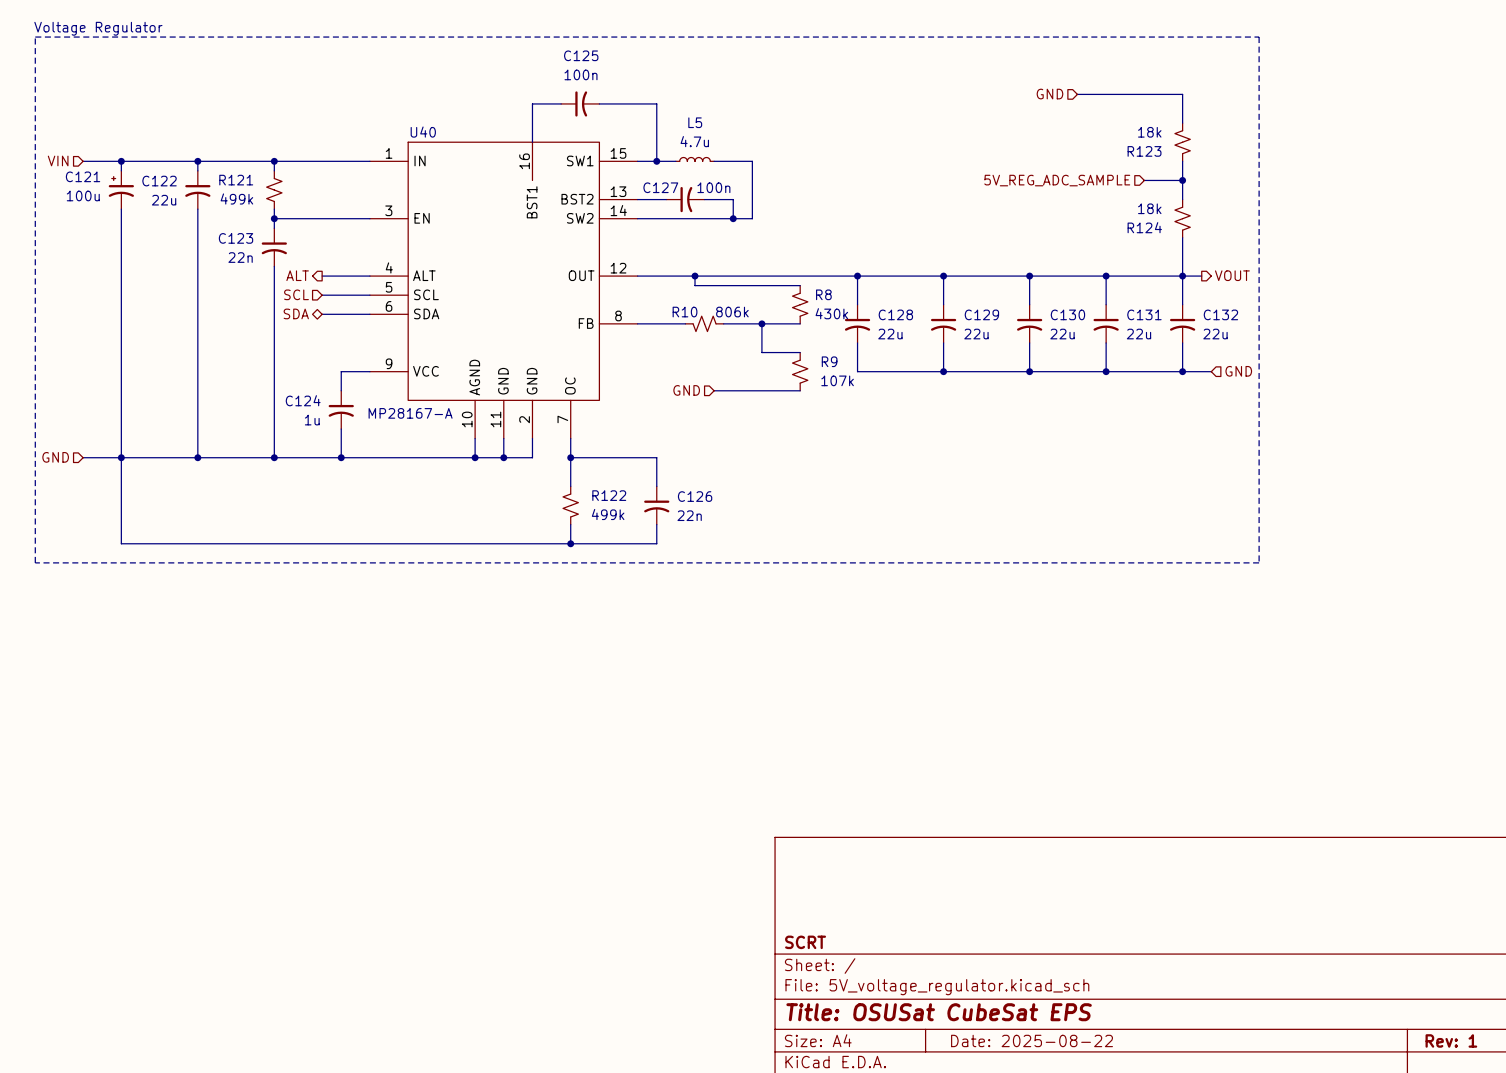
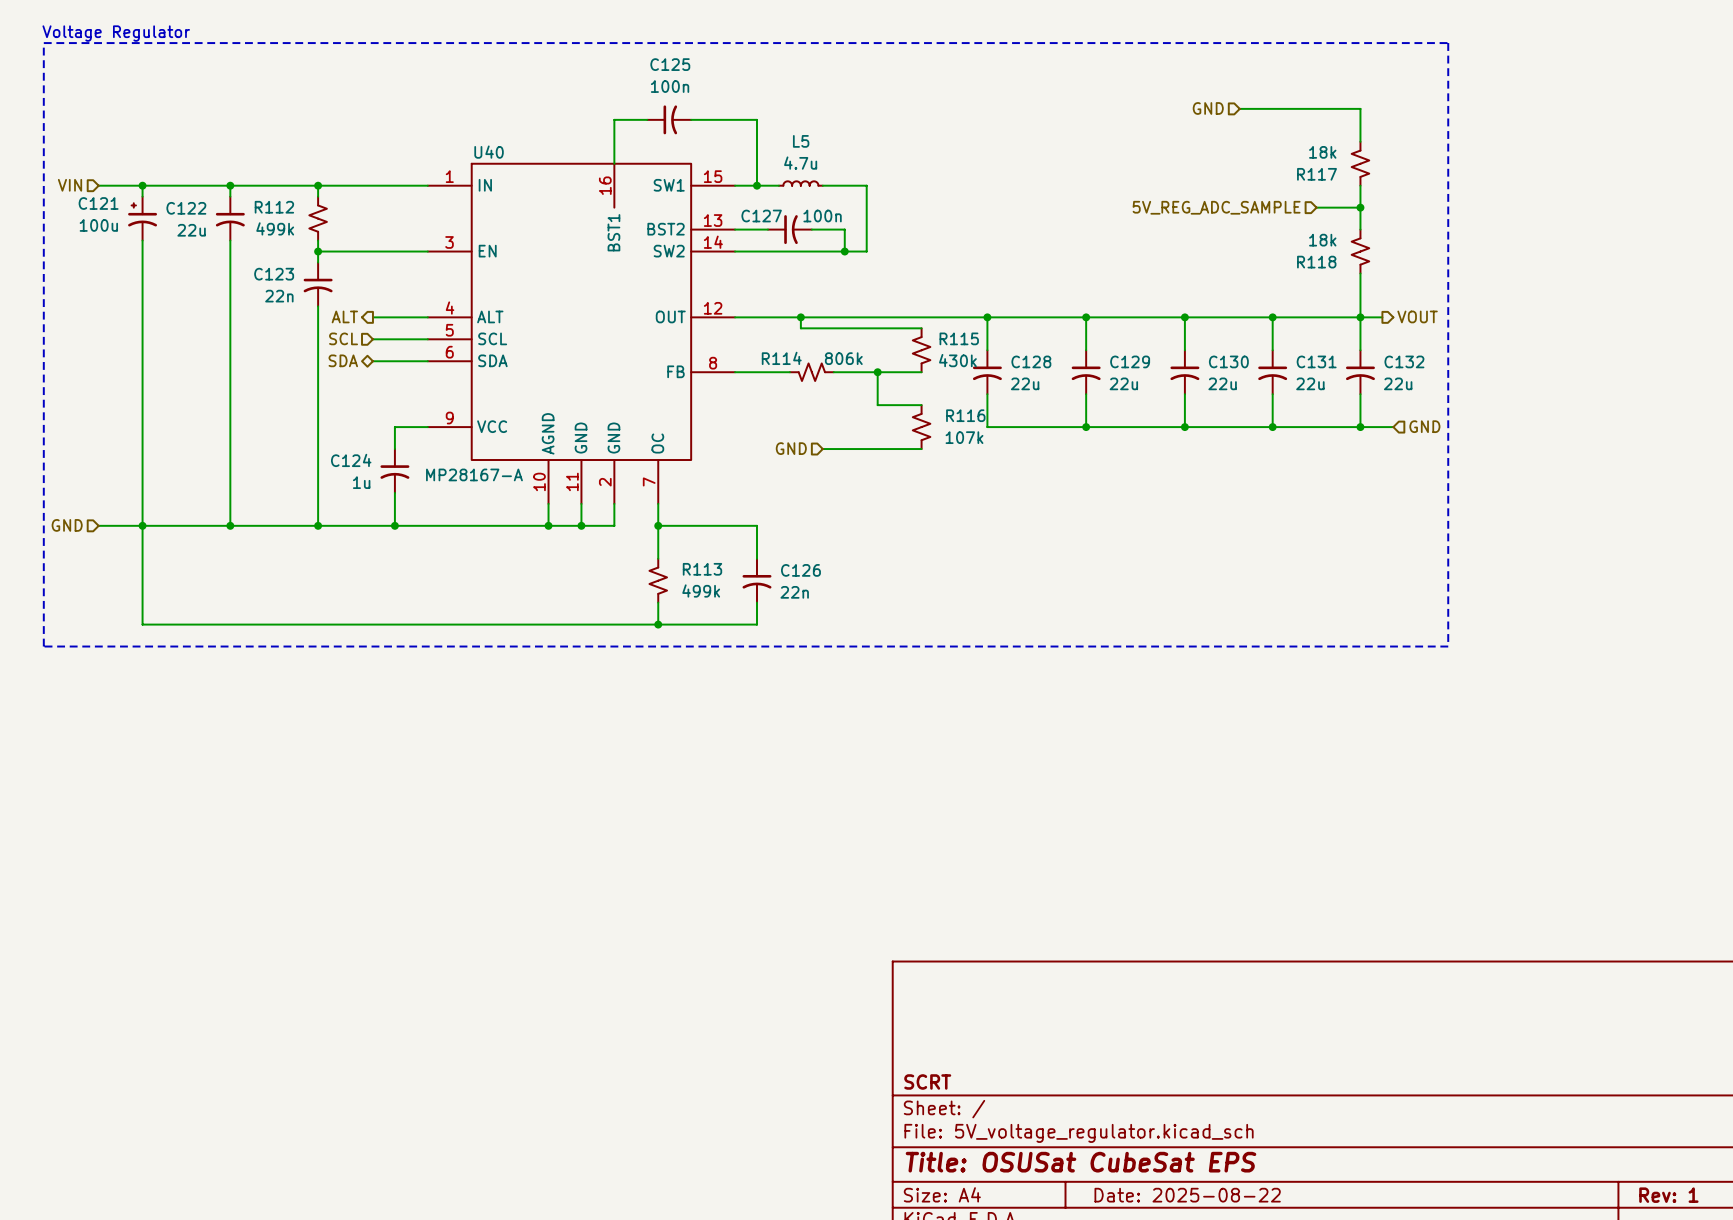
R123 name: R123 (1144, 151) -> R117 (1317, 174)
R121 name: R121 (236, 180) -> R112 (274, 207)
R124 name: R124 (1144, 227) -> R118 (1316, 262)
R8 name: R8 (823, 294) -> R115 (959, 338)
R10 name: R10 (685, 312) -> R114 (781, 358)
R9 name: R9 (829, 361) -> R116 (965, 415)
R122 name: R122 (609, 495) -> R113 (702, 569)

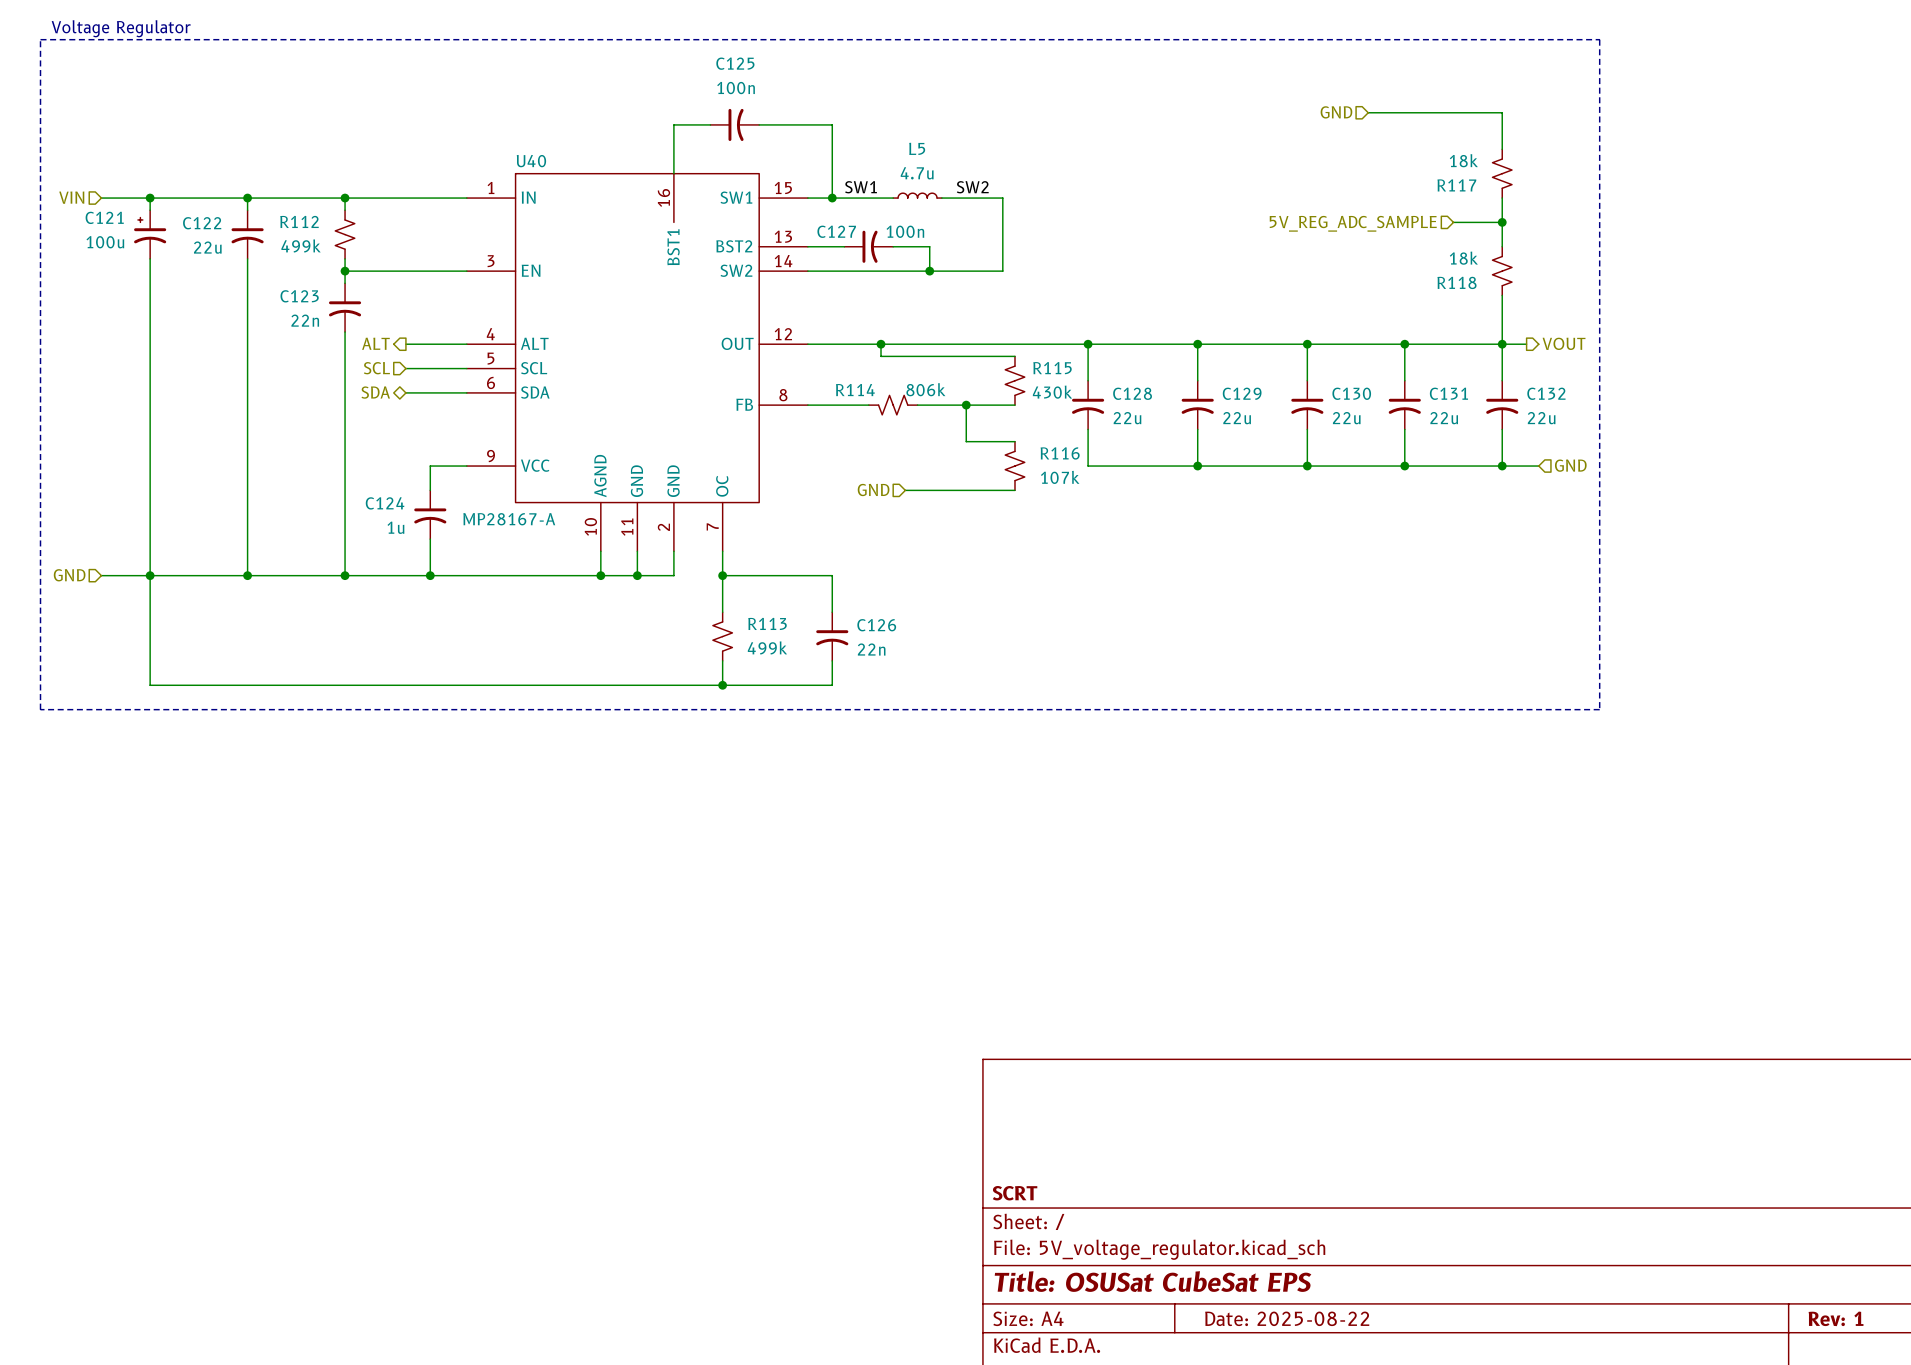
label: none -> SW1 (861, 187)
label: none -> SW2 (972, 187)
L5 position: (800, 183) -> (917, 195)
wire: (822, 185) (855, 185) -> (856, 198) (893, 198)
wire: (866, 185) (866, 251) -> (954, 198) (1002, 198) (1002, 271) (954, 271)

